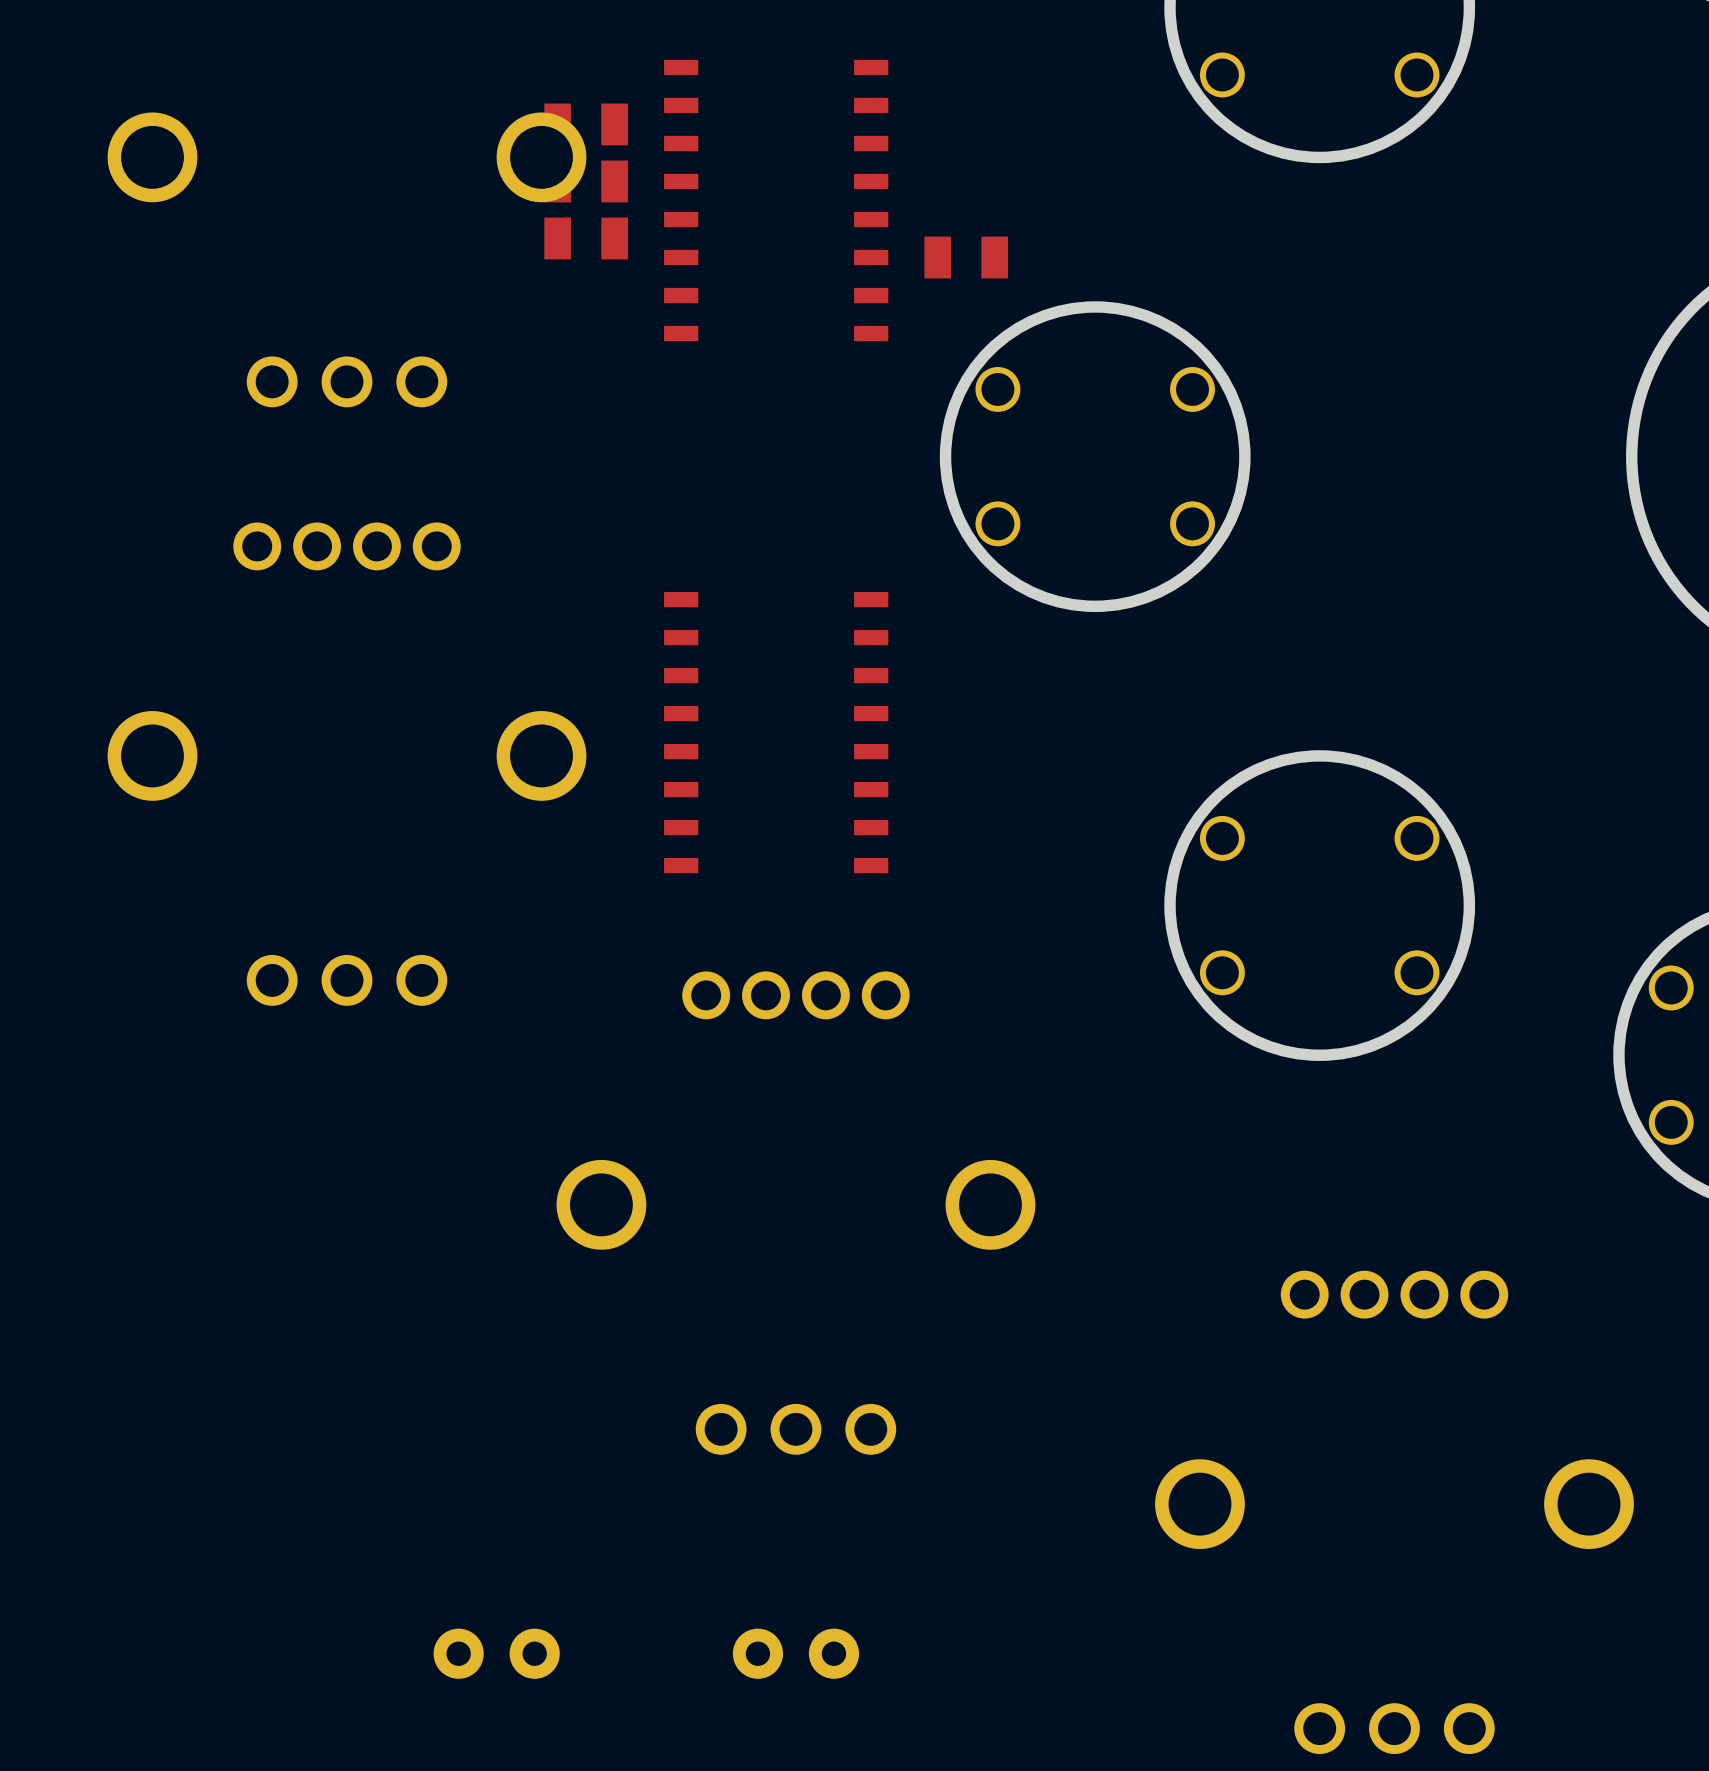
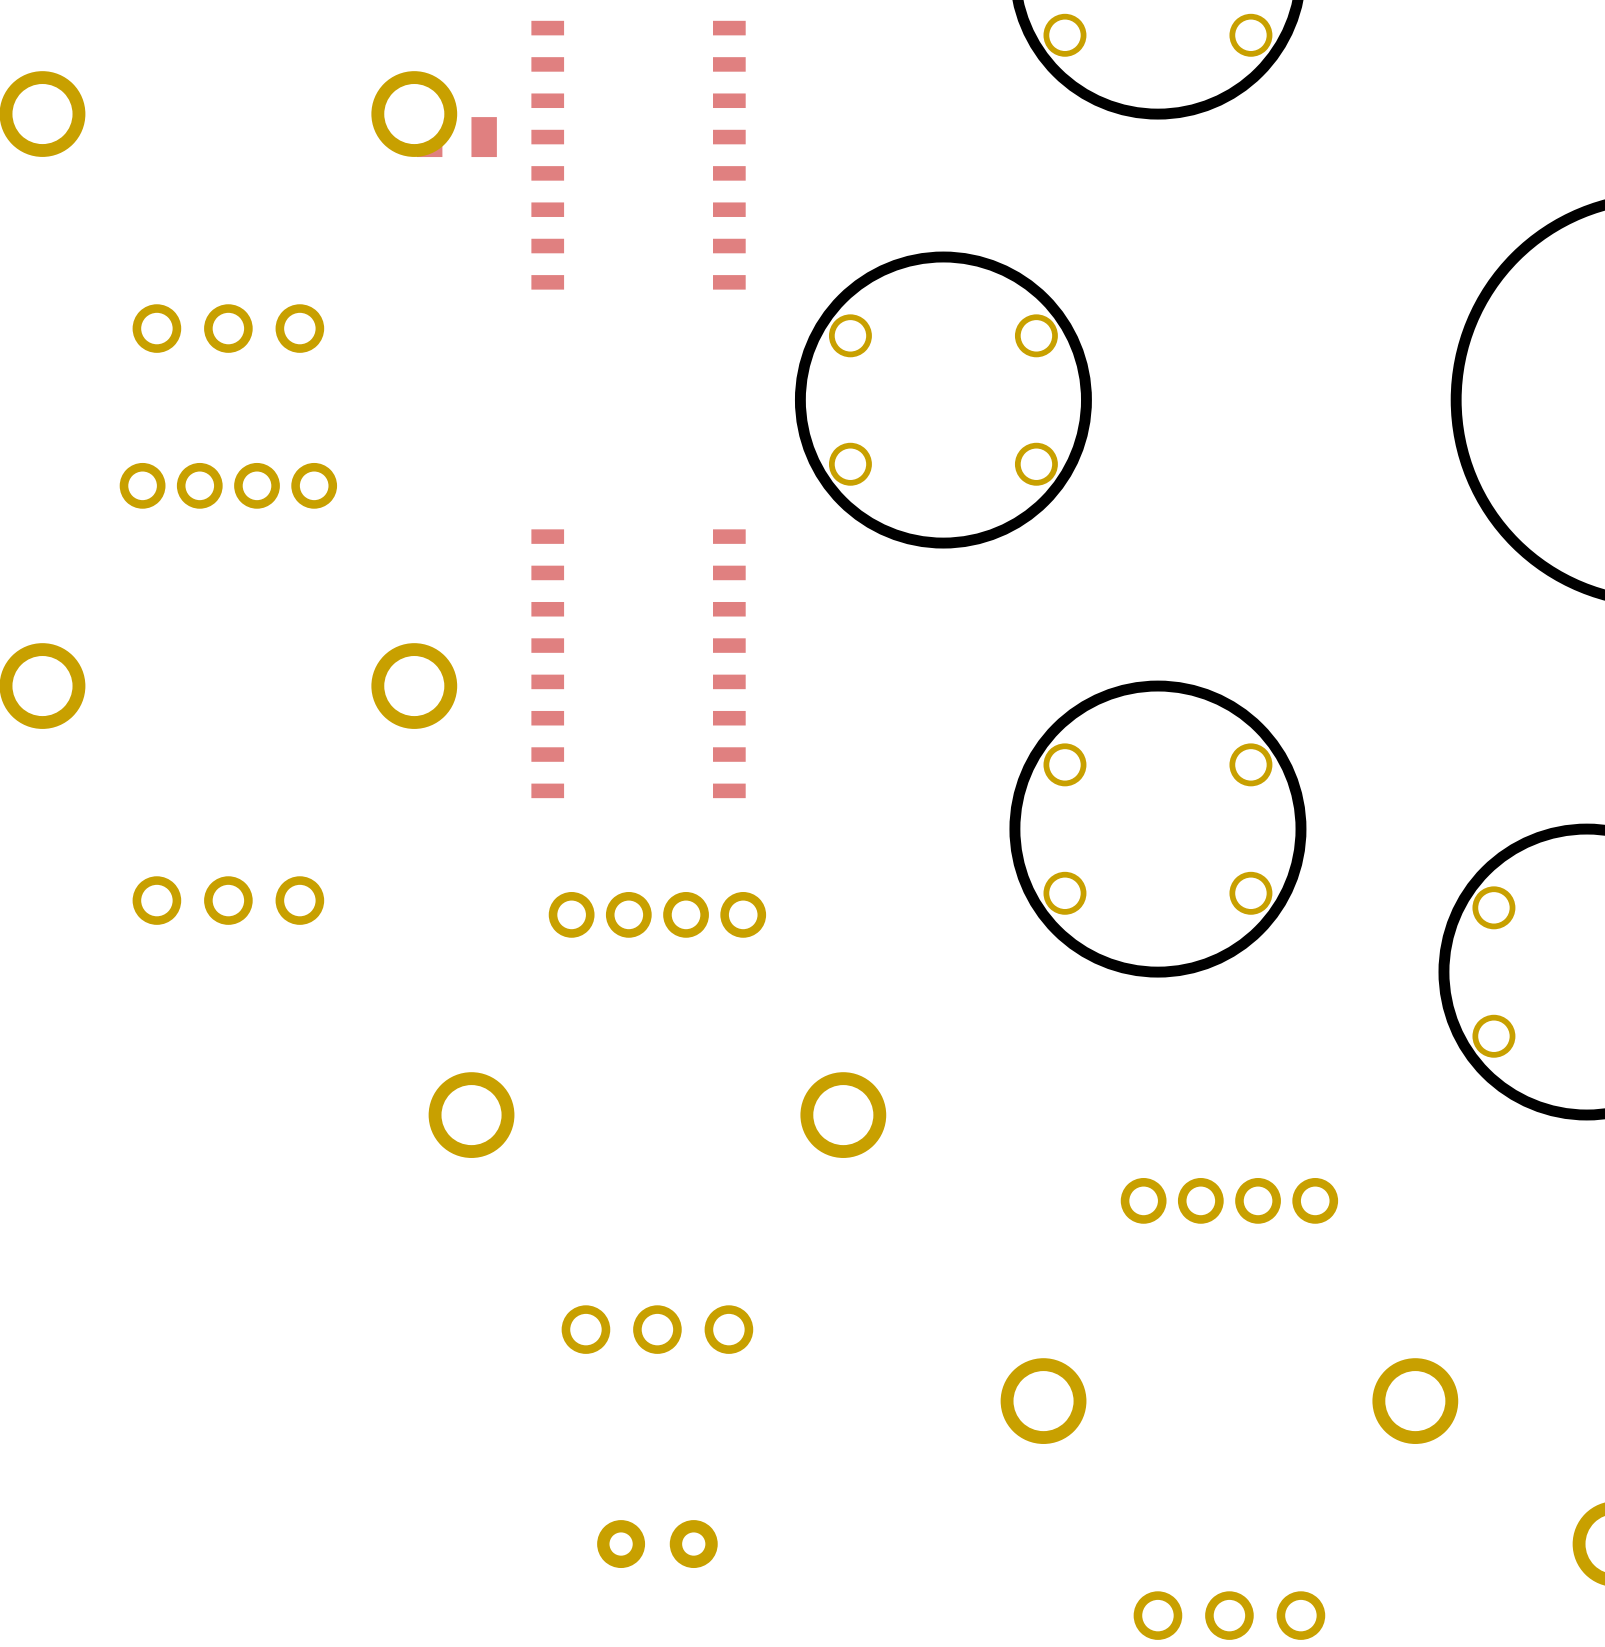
part: (586, 124) -> none
part: (586, 238) -> none
part: (966, 257) -> none
part: (496, 1653) -> none

